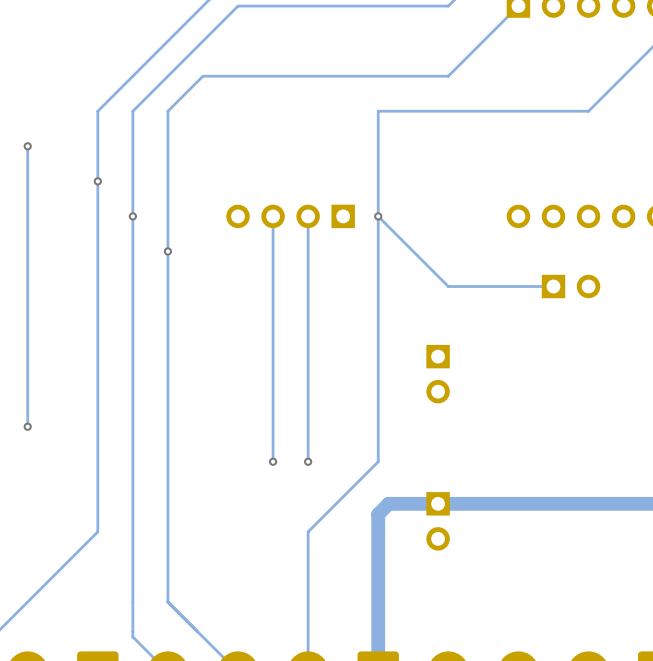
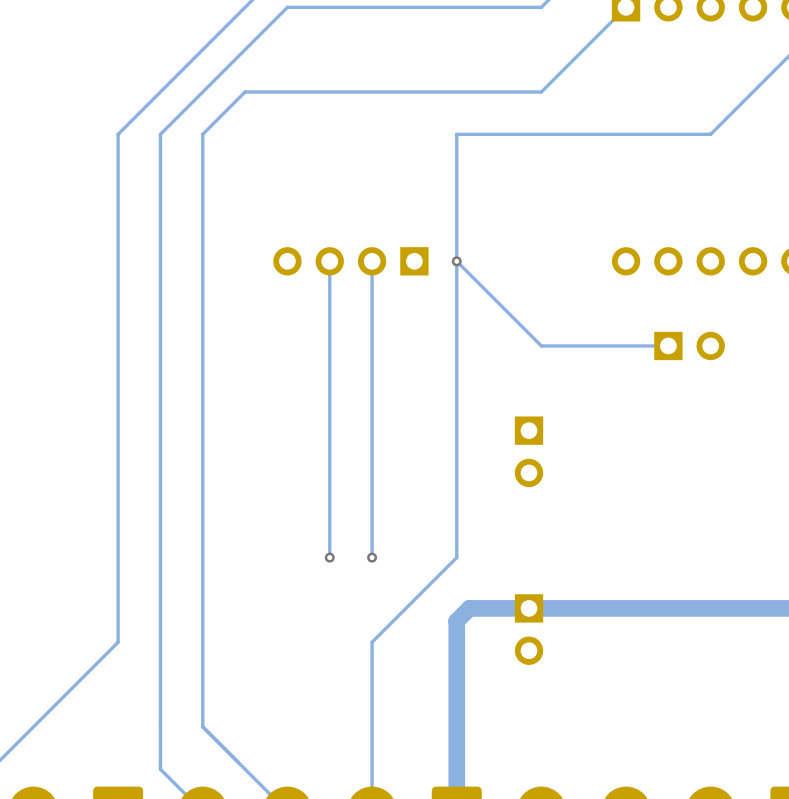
track: (27, 146) (27, 426) -> none
via: (27, 146) -> none
via: (97, 181) -> none
via: (132, 216) -> none
via: (167, 251) -> none
via: (27, 426) -> none

